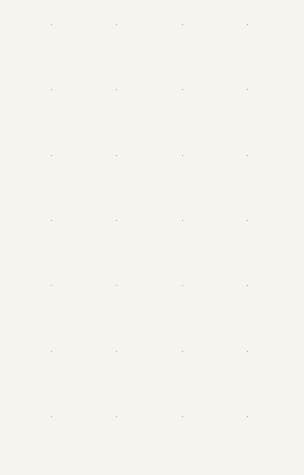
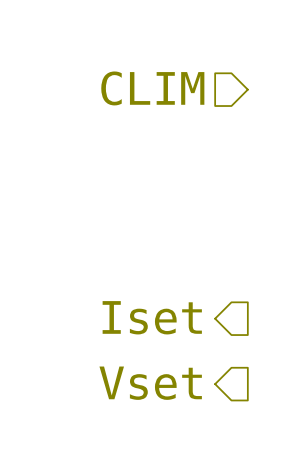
hierarchical label: none -> CLIM (152, 88)
hierarchical label: none -> Iset (152, 317)
hierarchical label: none -> Vset (150, 383)

